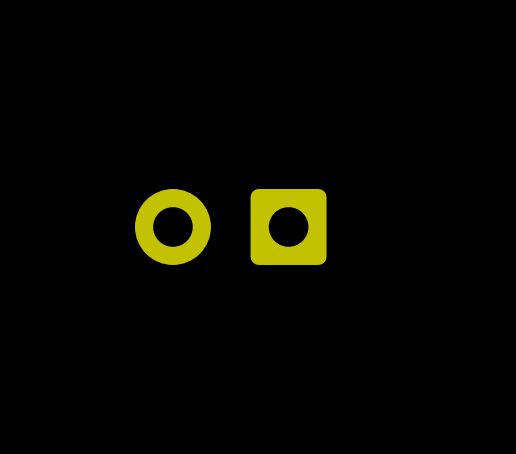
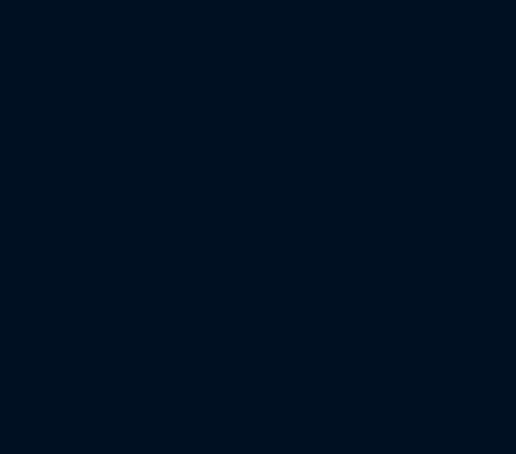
part: (230, 226) -> none

